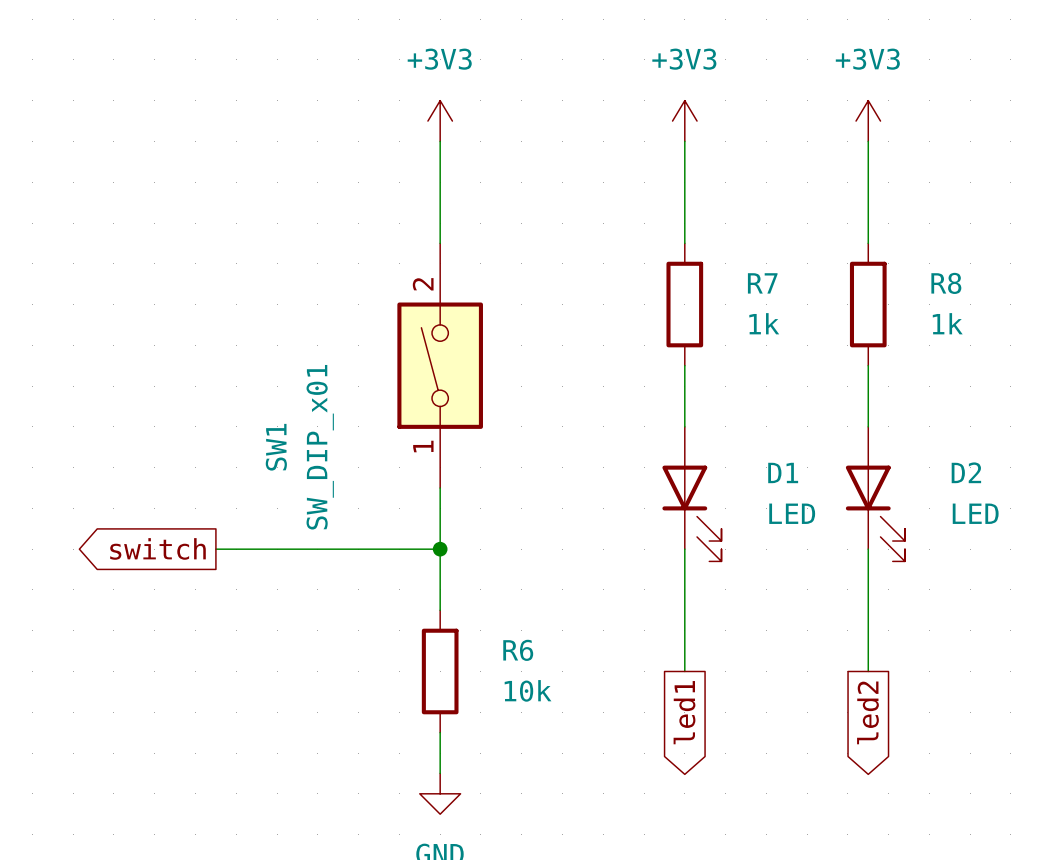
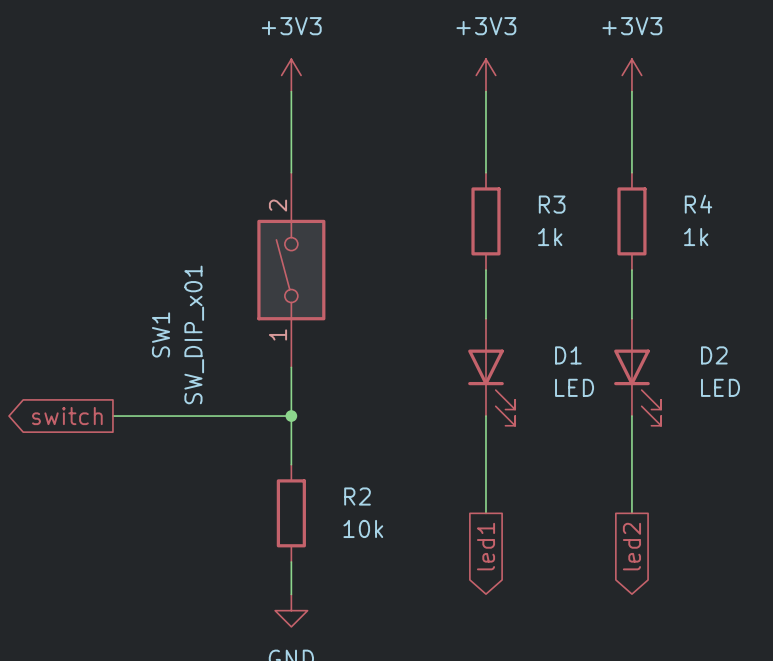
R7 name: R7 (762, 283) -> R3 (552, 204)
R8 name: R8 (946, 283) -> R4 (698, 204)
R6 name: R6 (518, 650) -> R2 (357, 496)

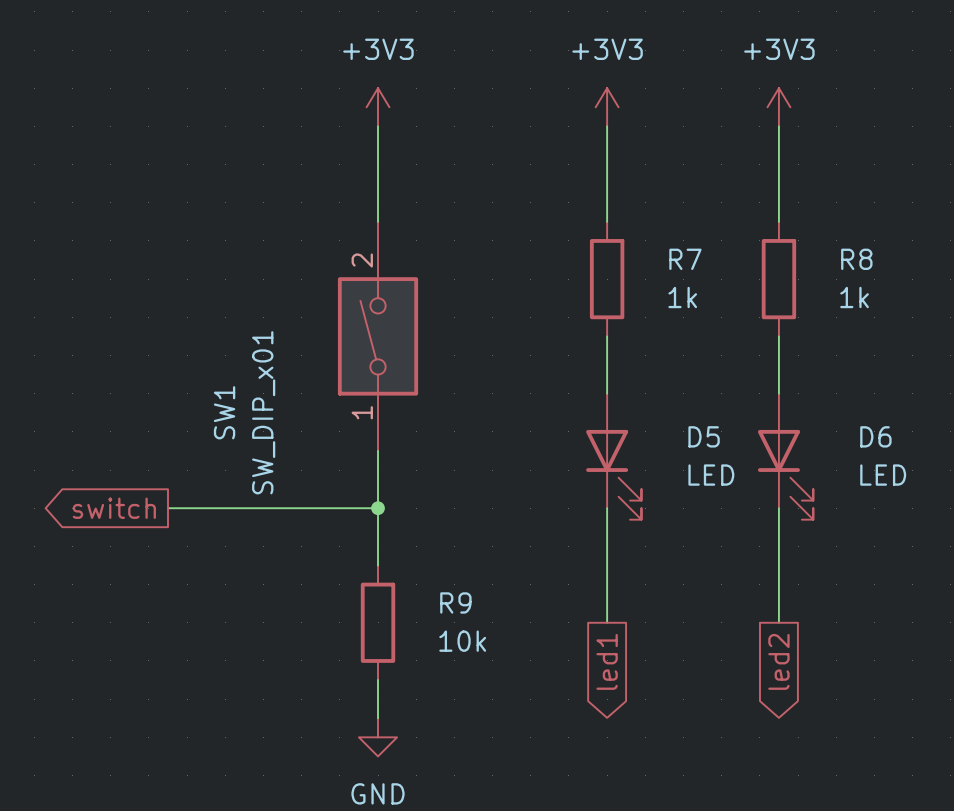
R3 name: R3 (552, 204) -> R7 (685, 259)
R4 name: R4 (698, 204) -> R8 (856, 259)
D1 name: D1 (568, 355) -> D5 (704, 436)
D2 name: D2 (714, 355) -> D6 (875, 436)
R2 name: R2 (357, 496) -> R9 (455, 602)

